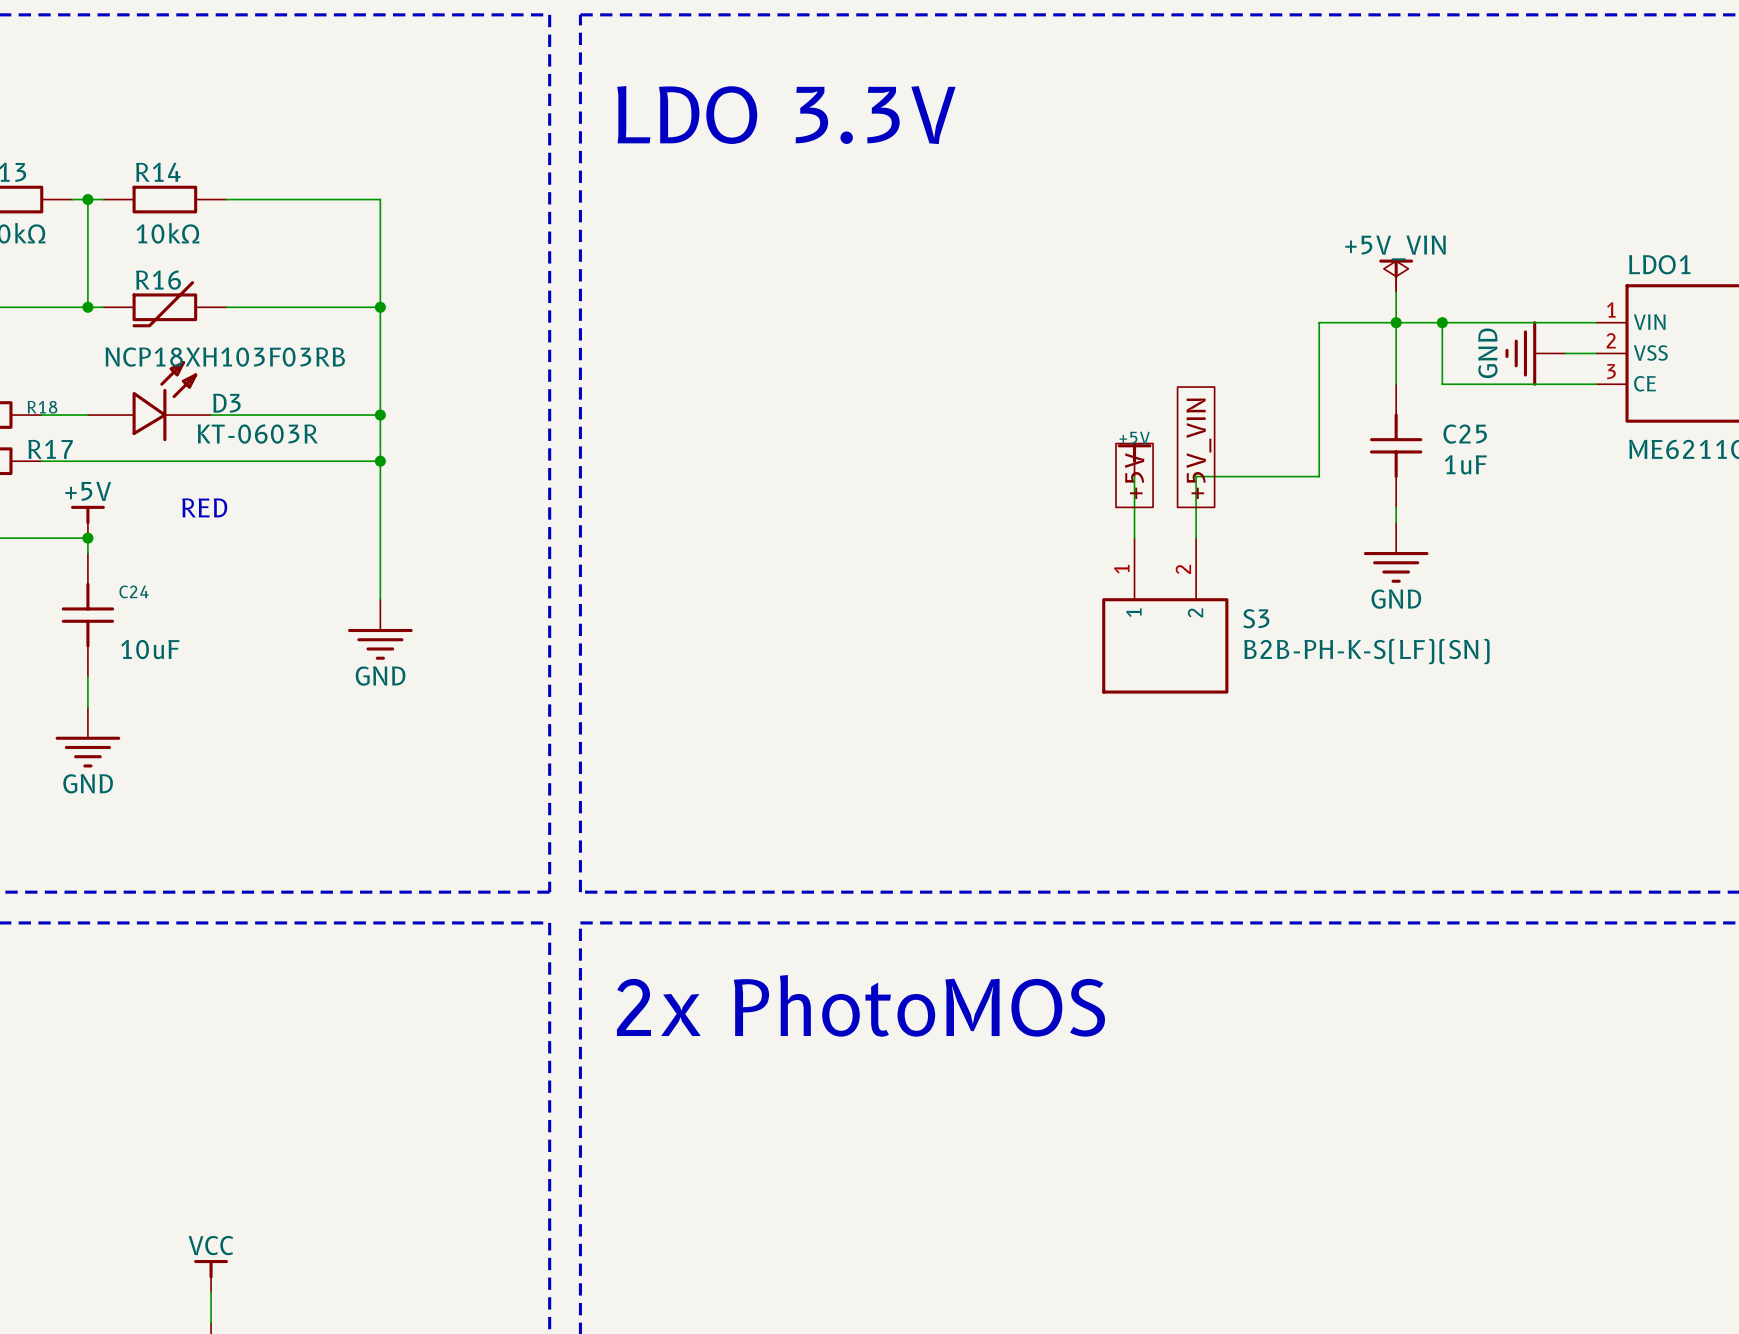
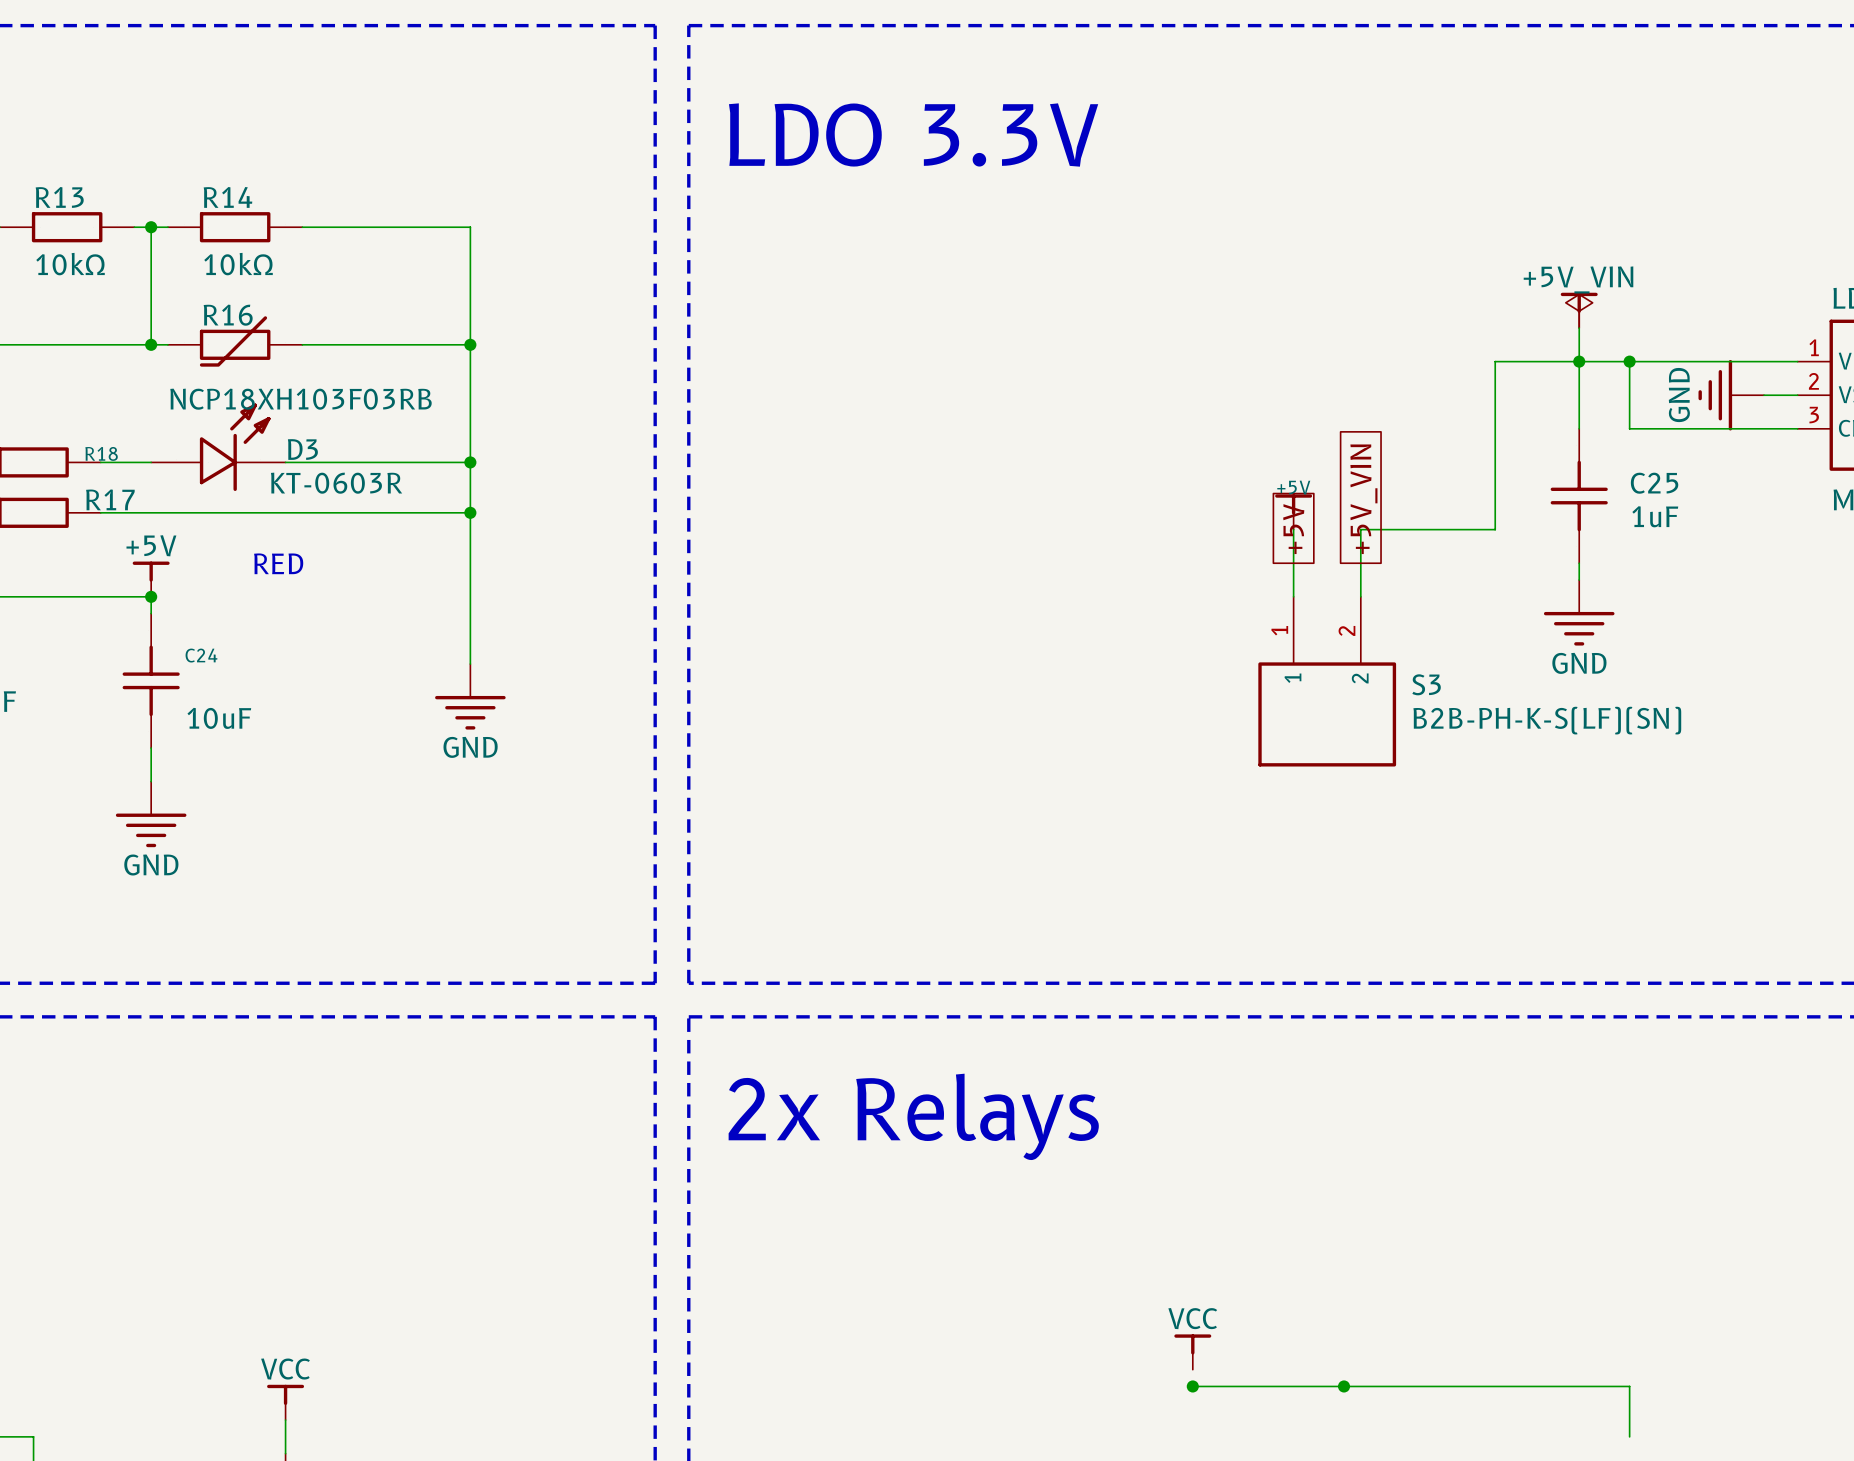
text: 2x PhotoMOS (860, 1005) -> 2x Relays (913, 1116)
power symbol: none -> VCC (1192, 1352)
wire: none -> (1192, 1386) (1629, 1386) (1629, 1436)
junction: none -> (1192, 1386)
junction: none -> (1344, 1386)

